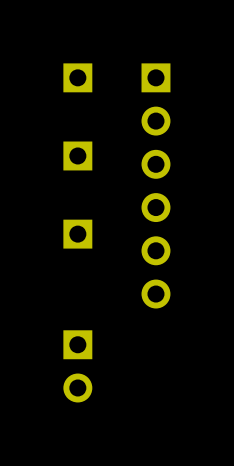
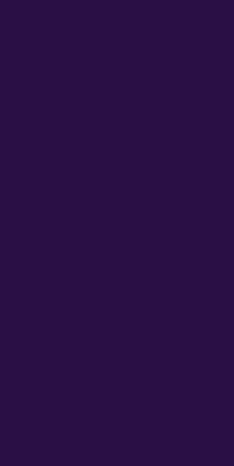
part: (77, 77) -> none
part: (77, 155) -> none
part: (155, 185) -> none
part: (77, 234) -> none
part: (77, 366) -> none

